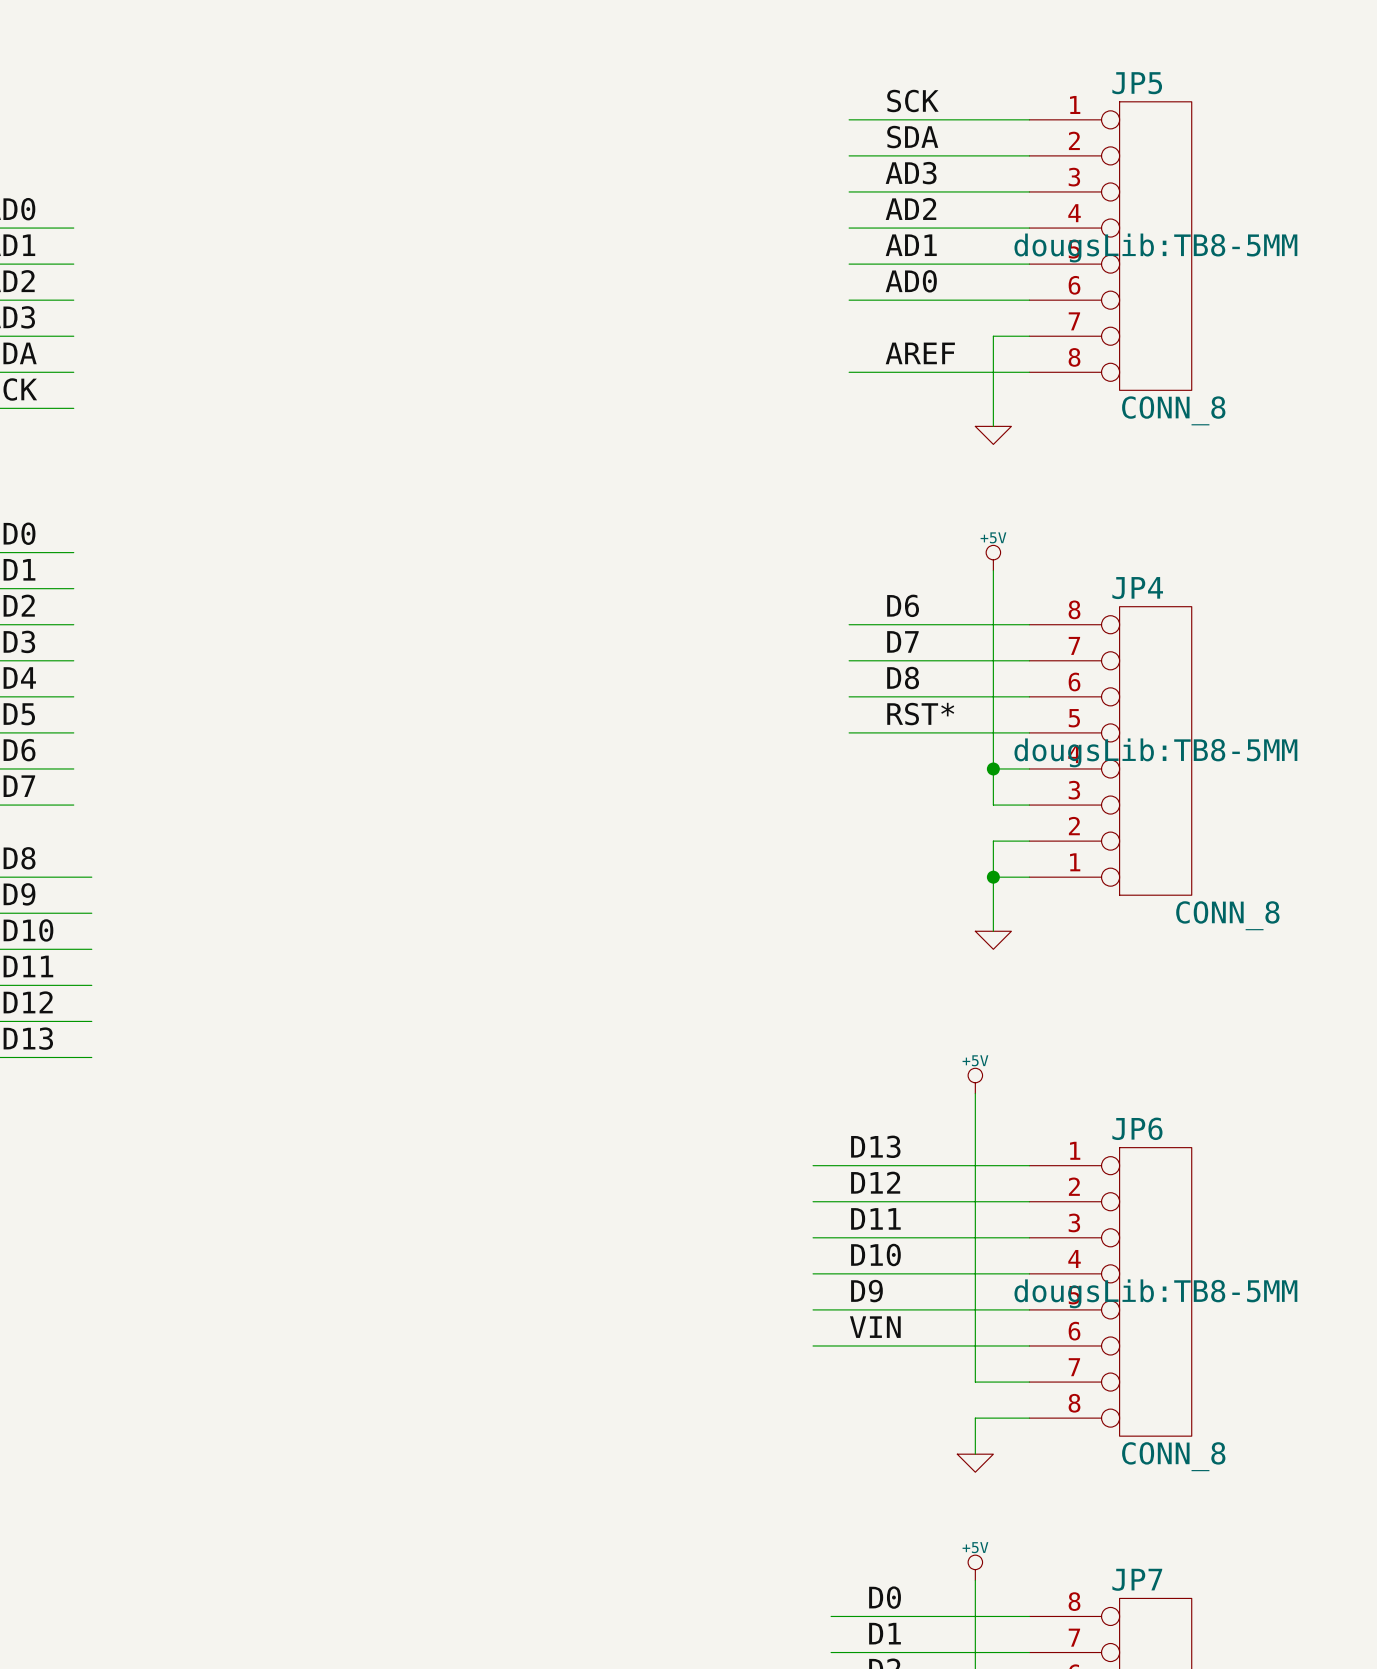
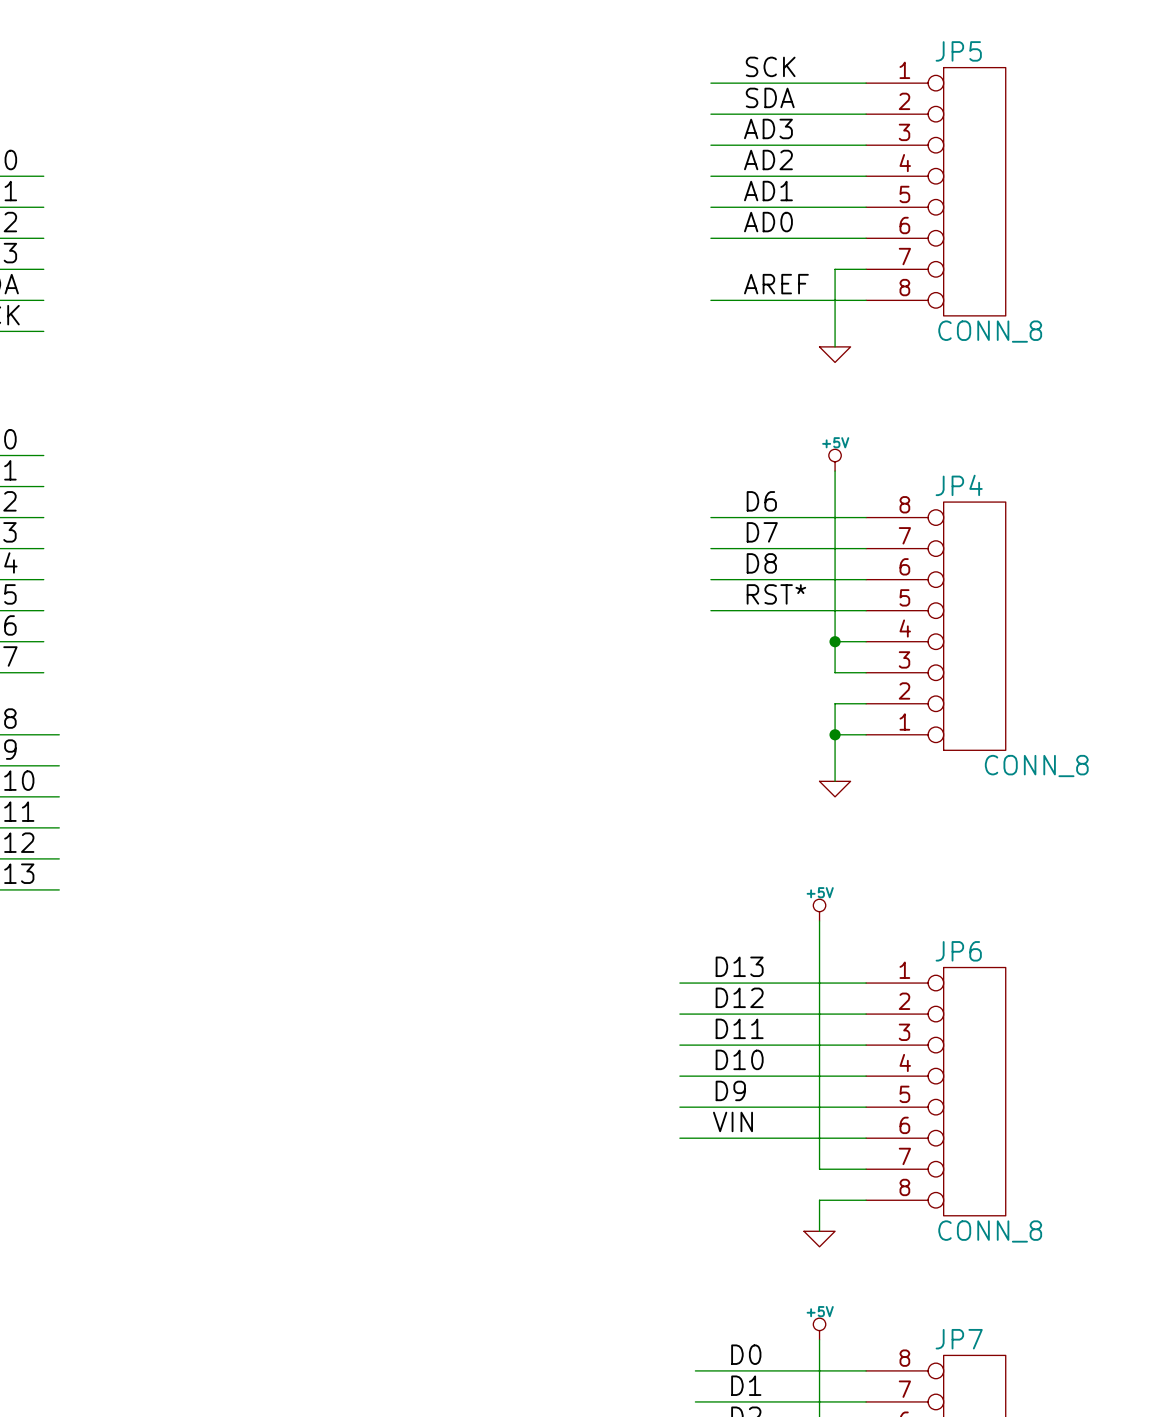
JP5 text: dougsLib:TB8-5MM (1155, 247) -> none
JP4 text: dougsLib:TB8-5MM (1155, 752) -> none
JP6 text: dougsLib:TB8-5MM (1155, 1293) -> none

